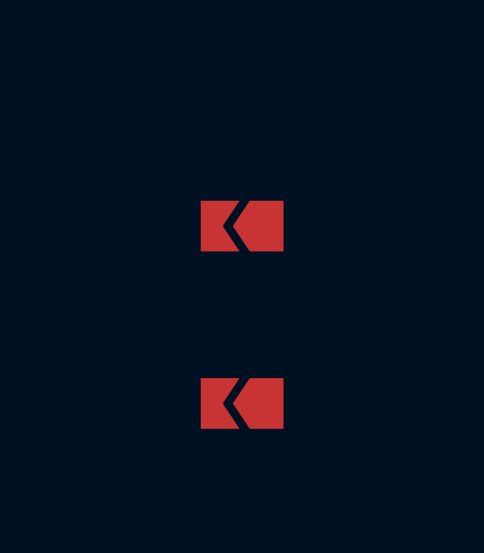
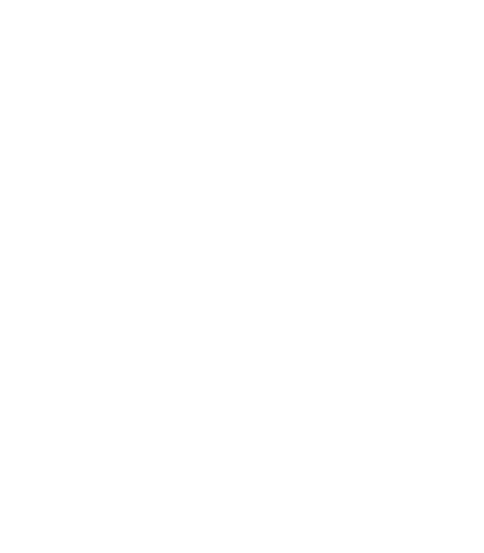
part: (242, 226) -> none
part: (242, 403) -> none

